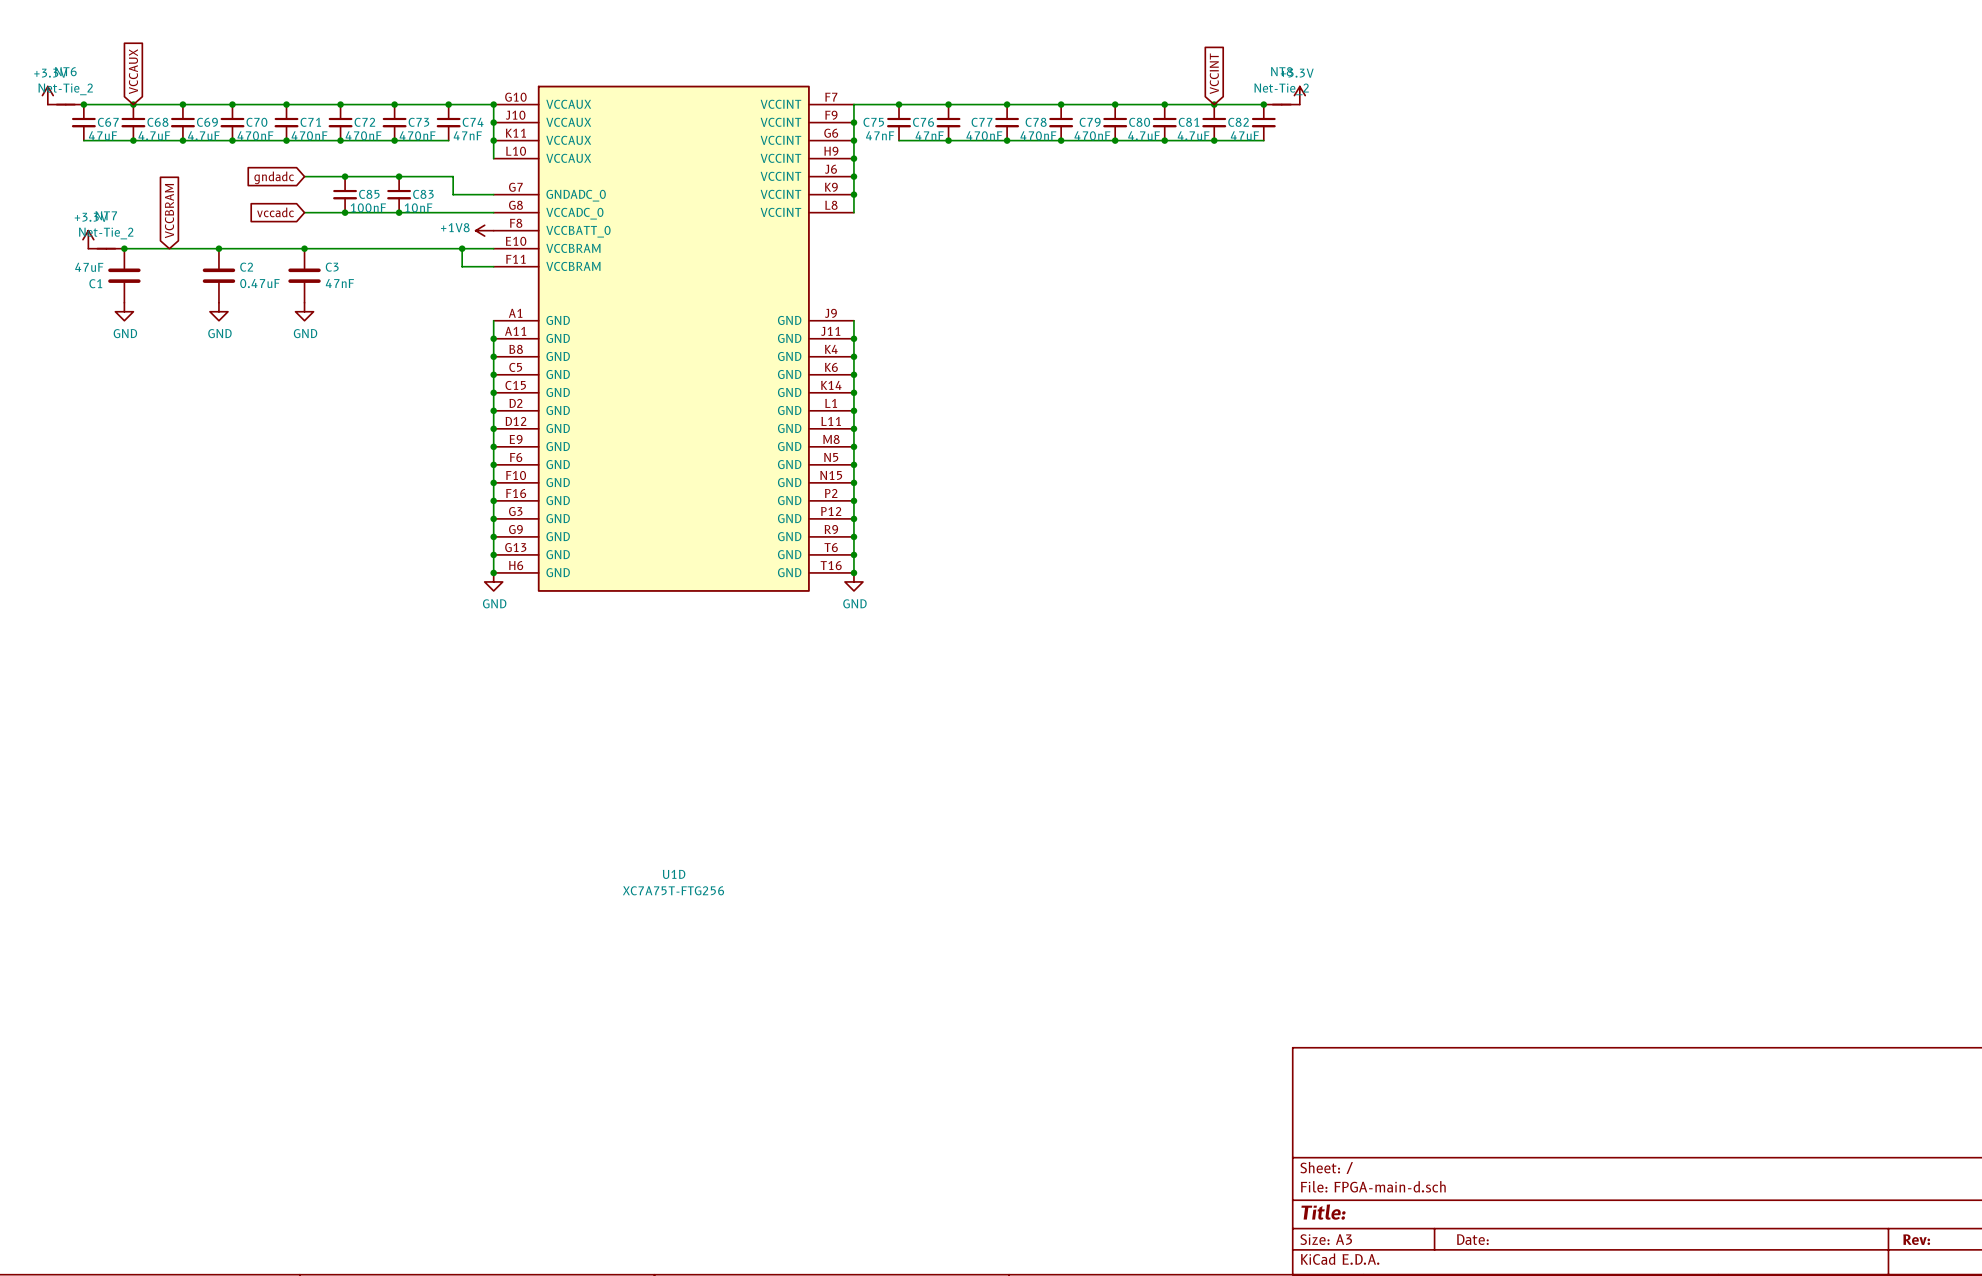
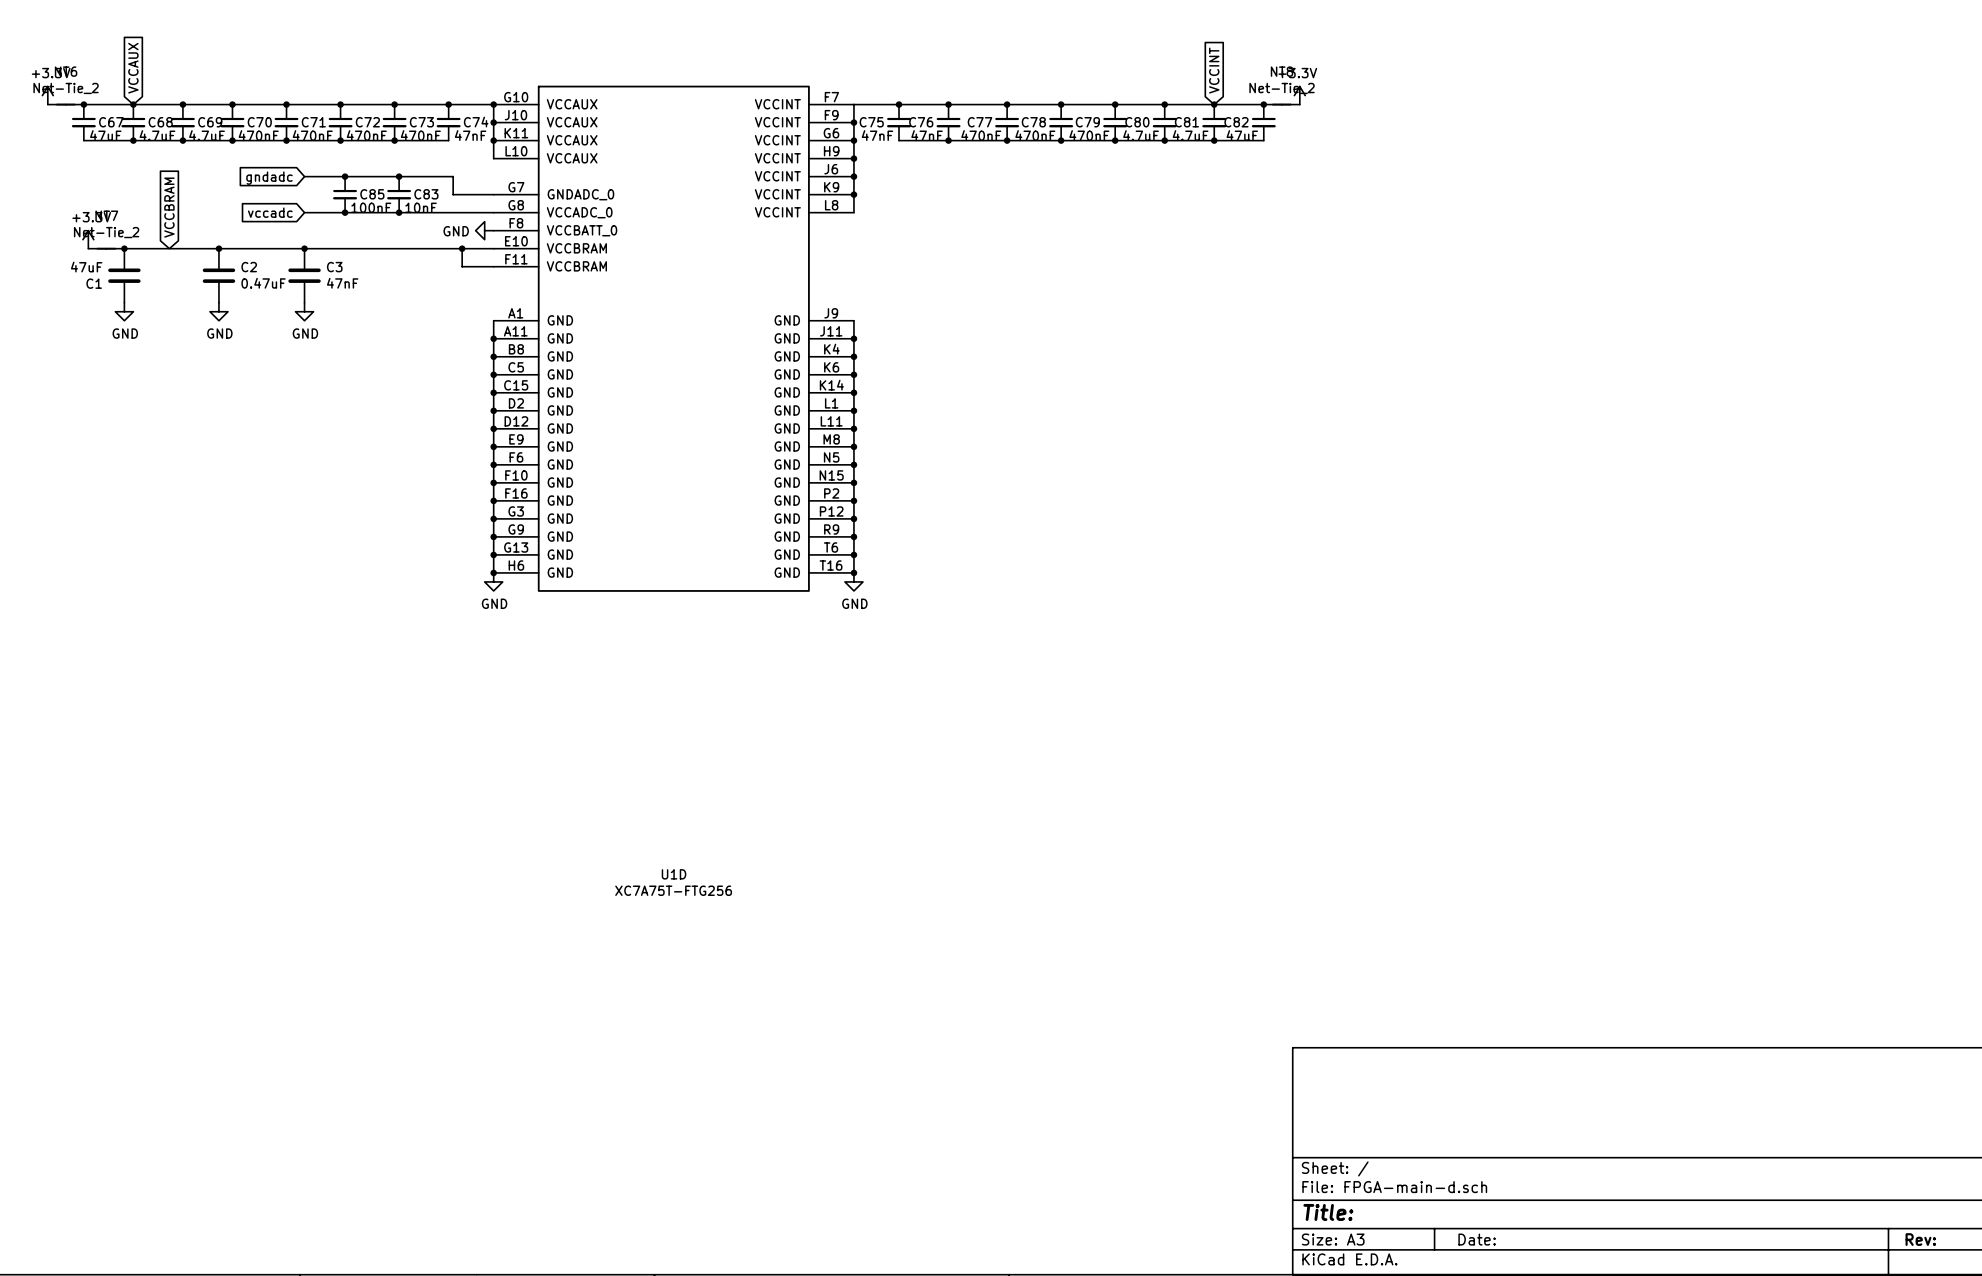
power symbol: +1V8 (484, 230) -> GND (484, 230)

